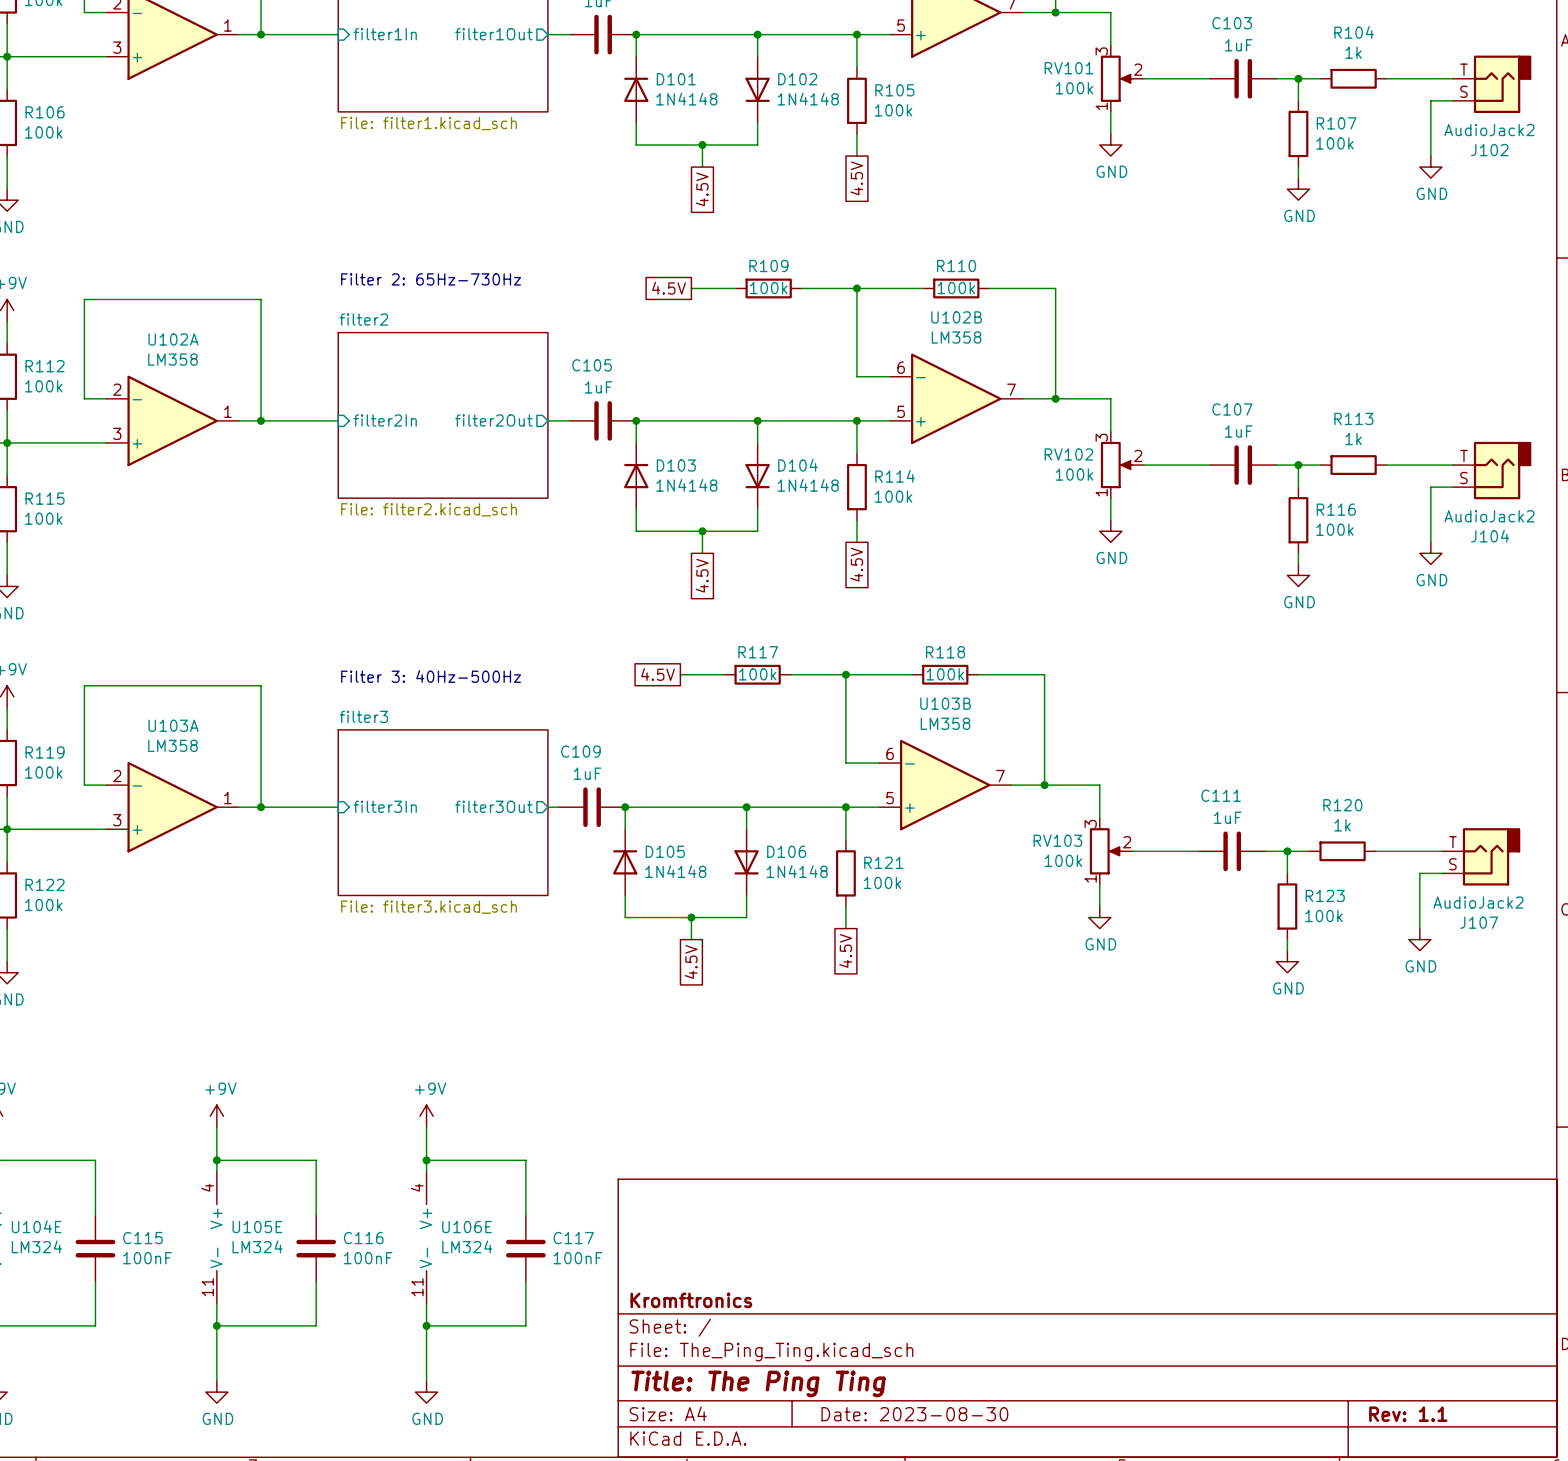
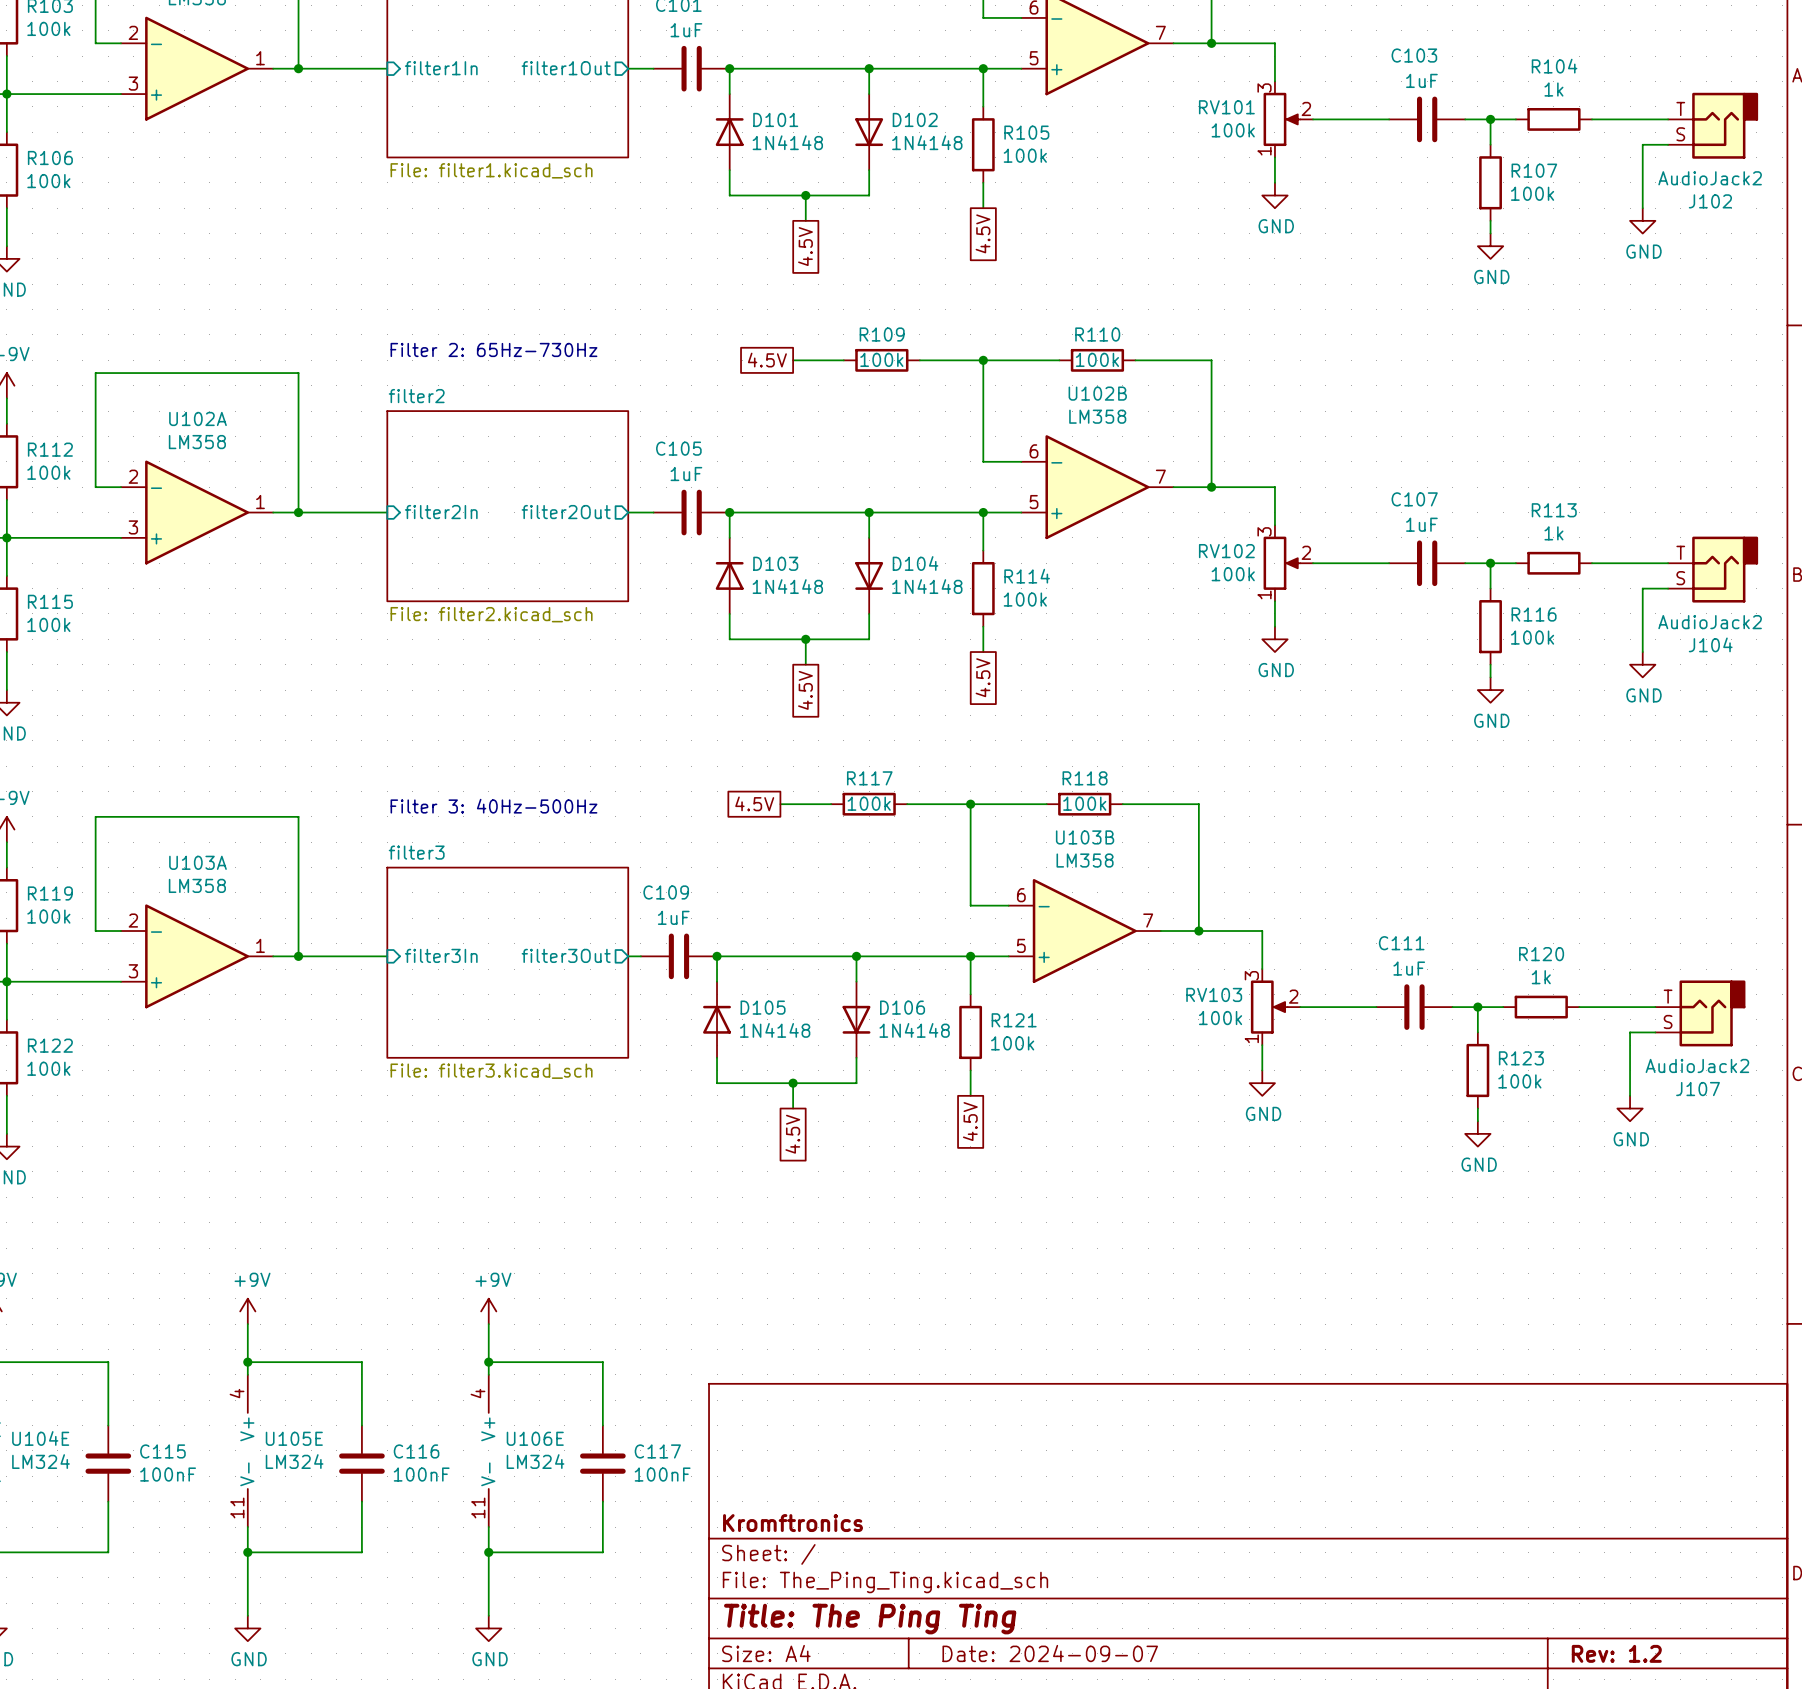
title block: Date: 2023-08-30 (914, 1414) -> Date: 2024-09-07 (1050, 1653)
title block: Rev: 1.1 (1408, 1414) -> Rev: 1.2 (1616, 1653)

